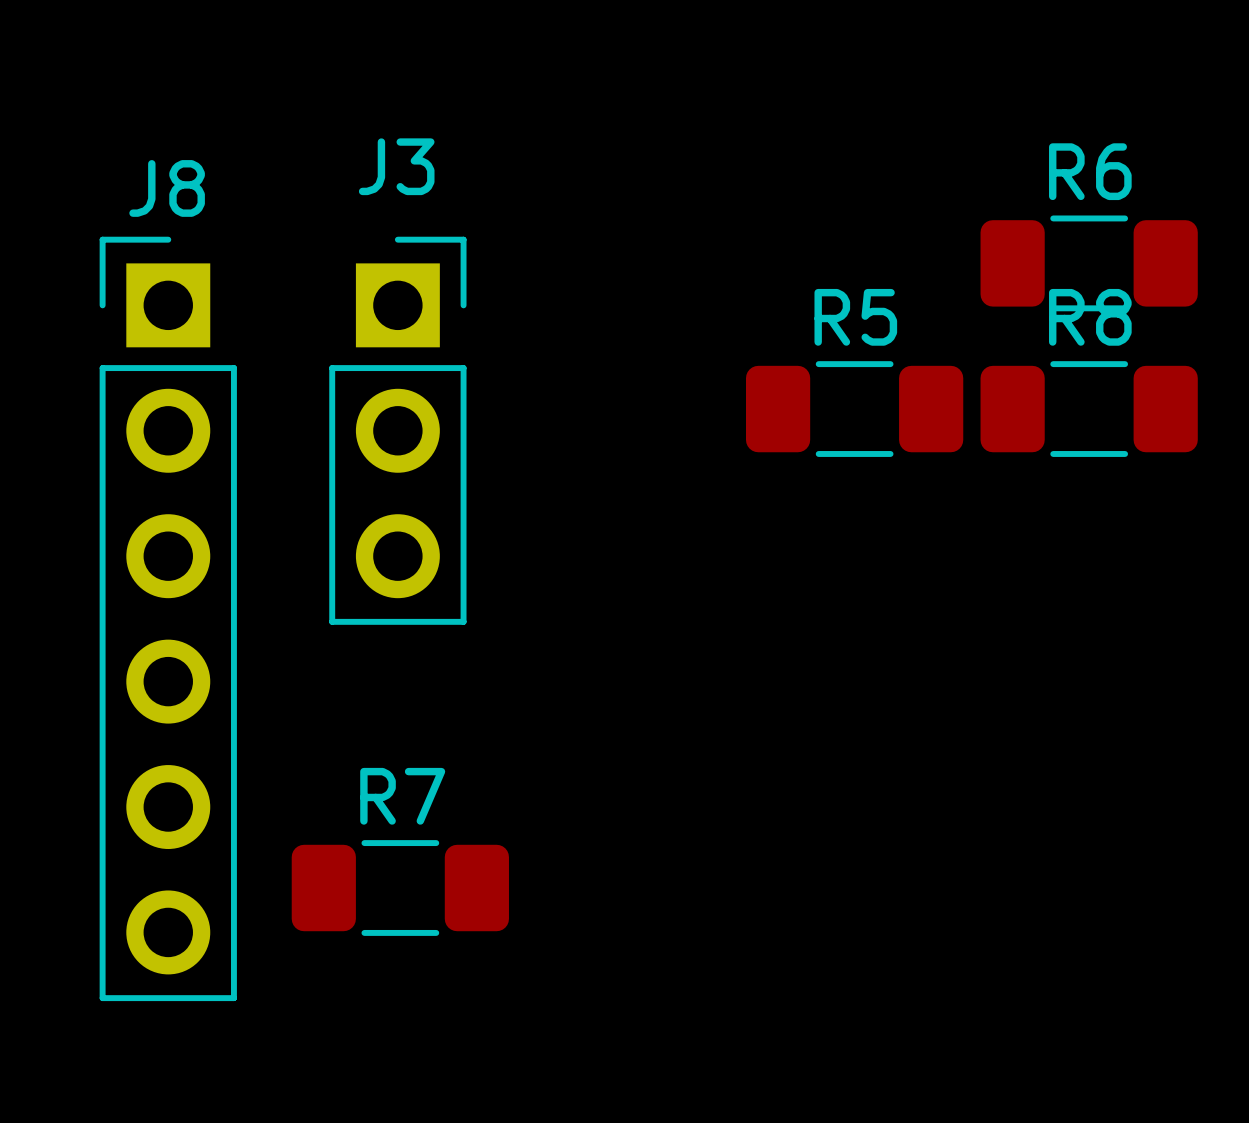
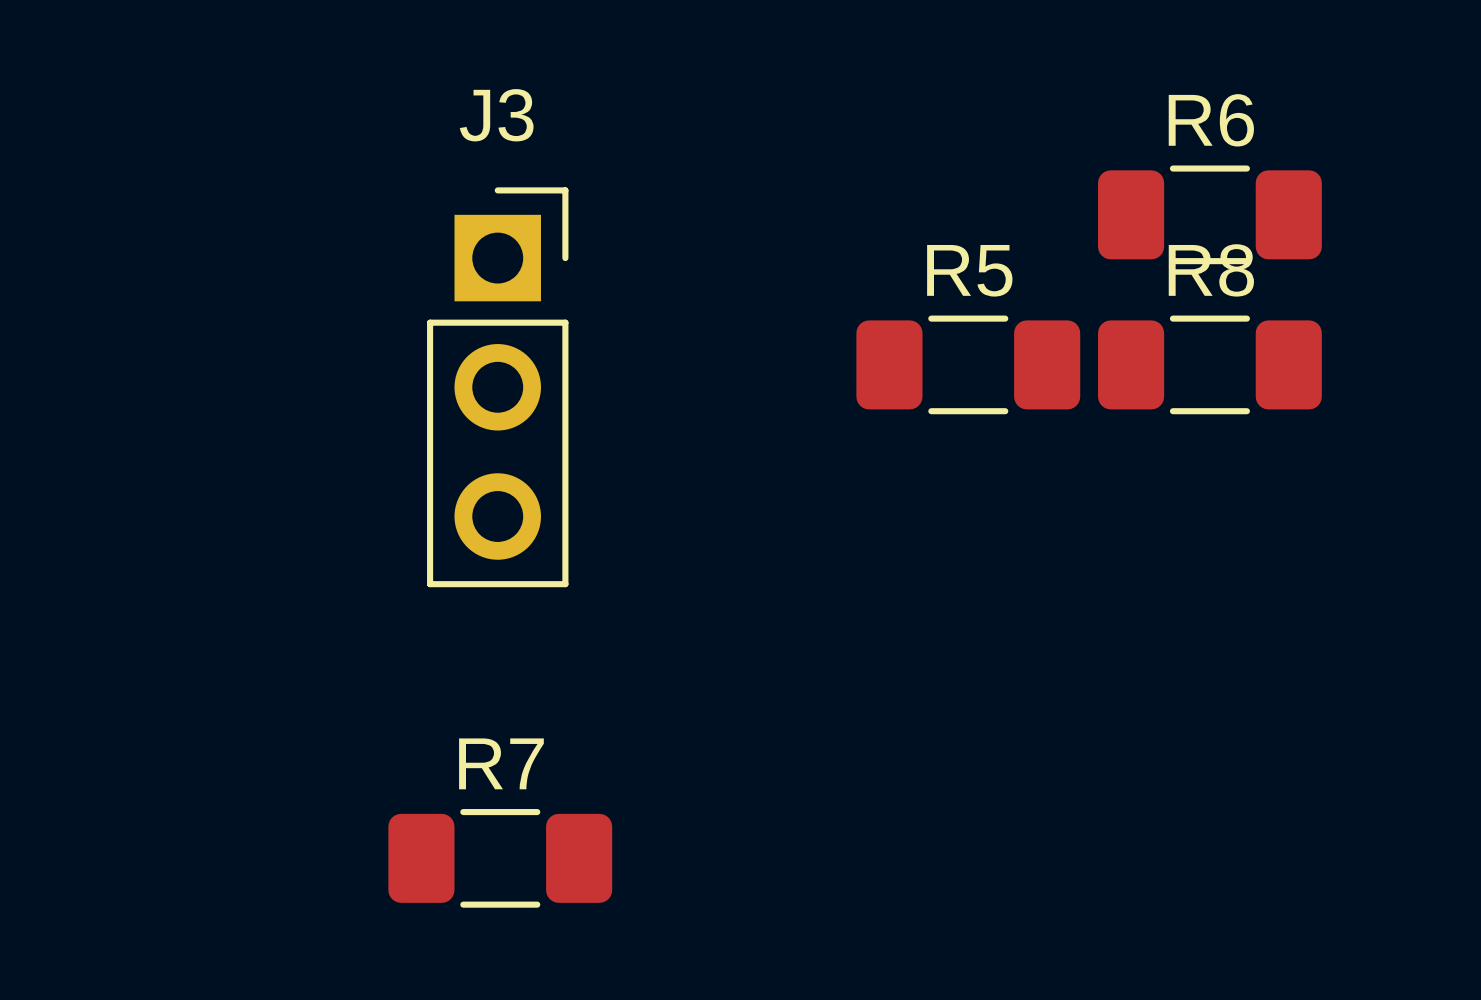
J8: (168, 618) -> none

